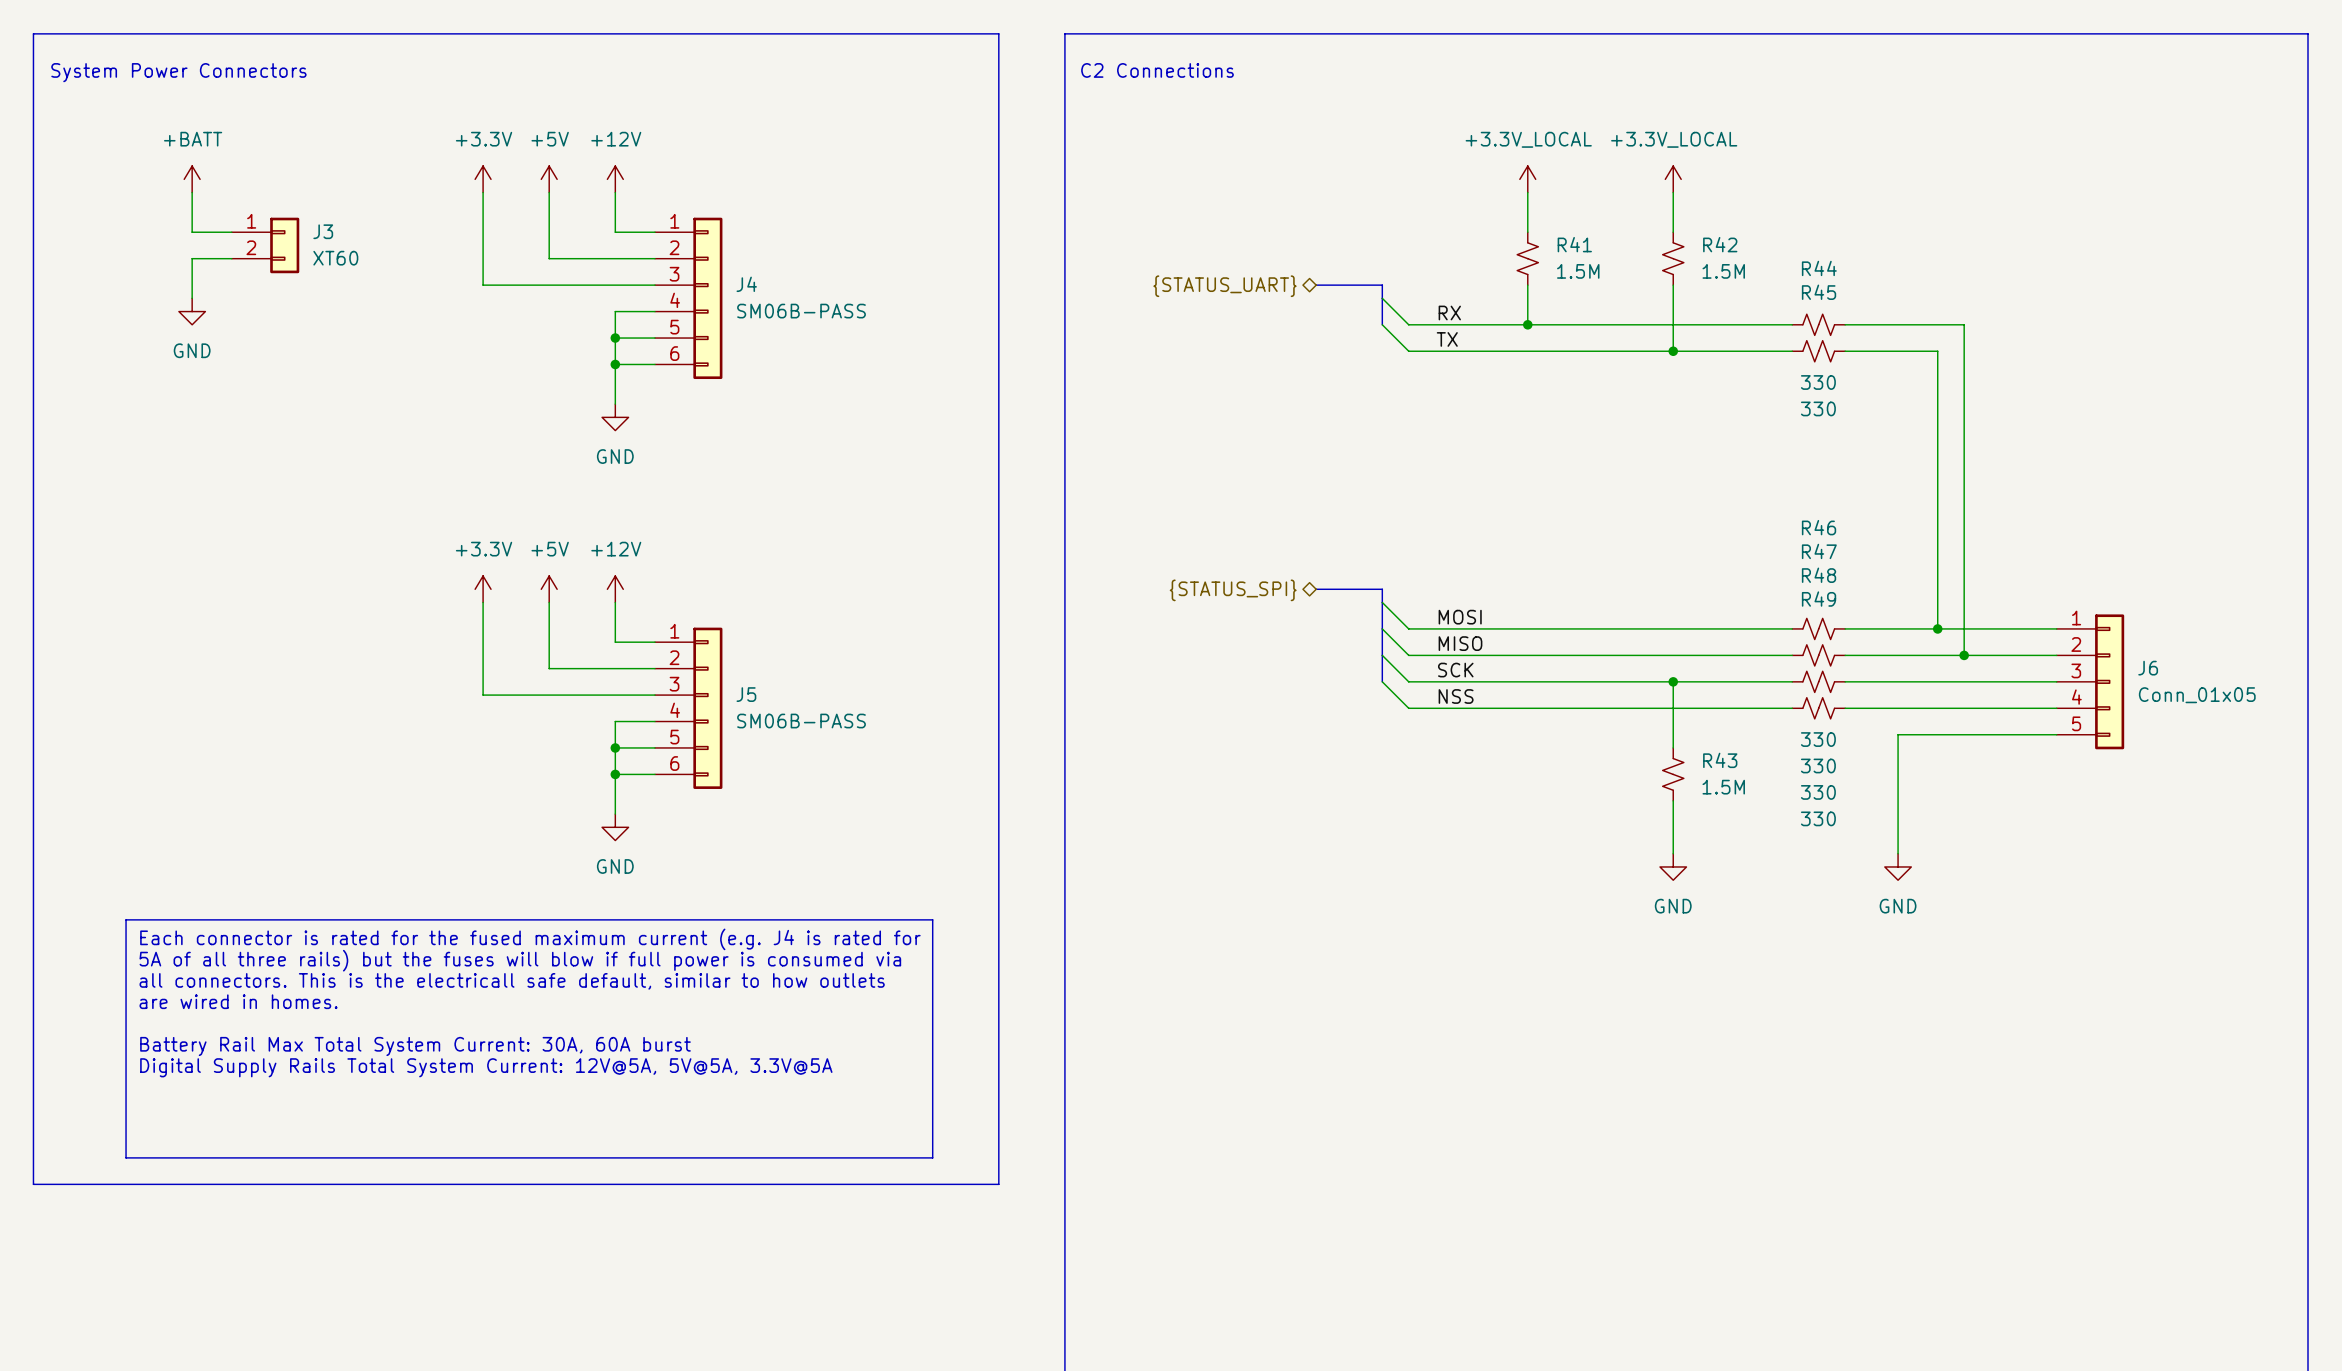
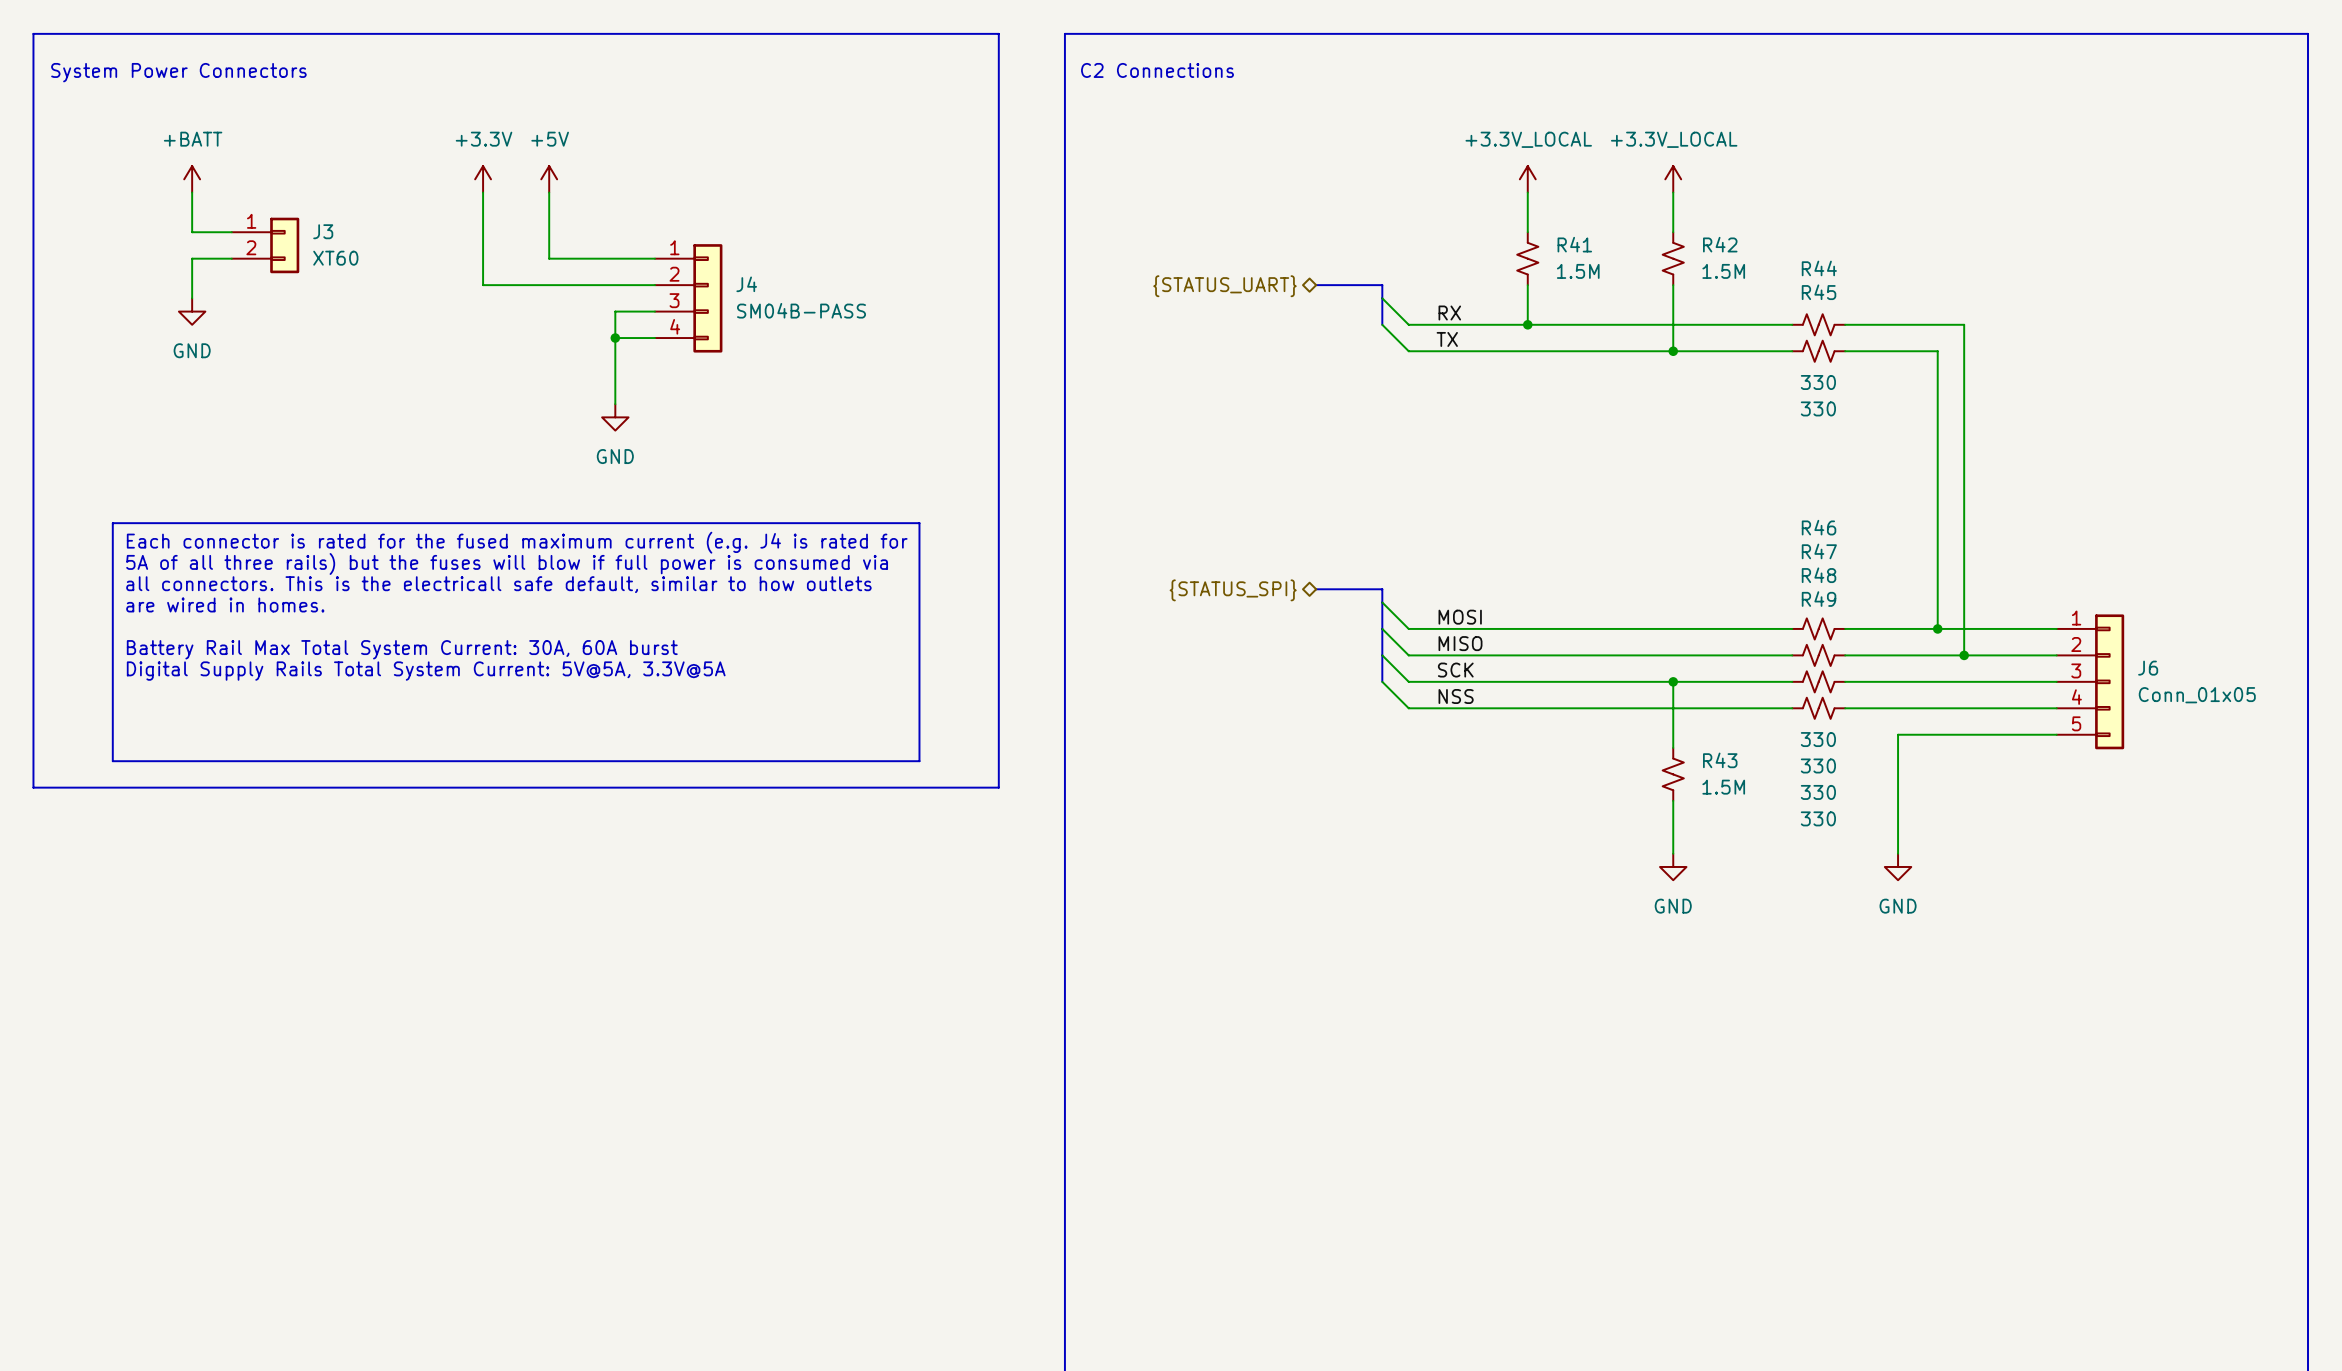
power symbol: +12V (615, 179) -> none
wire: (615, 192) (615, 232) (654, 232) -> none
J4 symbol: [654, 217, 723, 380] -> [654, 244, 723, 353]
J4 value: SM06B-PASS (801, 311) -> SM04B-PASS (801, 310)
wire: (615, 364) (654, 364) -> none
junction: (615, 364) -> none
line: none -> (112, 523) (919, 523) (919, 761) (112, 761) (112, 523)
text: none -> Each connector is rated for the fused maximum current (e.g. J4 is rated for (517, 542)
text: none -> 5A of all three rails) but the fuses will blow if full power is consumed via (507, 563)
text: none -> all connectors. This is the electricall safe default, similar to how outlets (498, 584)
power symbol: +3.3V (483, 589) -> none
power symbol: +5V (549, 589) -> none
power symbol: +12V (615, 589) -> none
wire: (483, 602) (483, 695) (654, 695) -> none
wire: (549, 602) (549, 668) (654, 668) -> none
wire: (615, 602) (615, 642) (654, 642) -> none
text: none -> are wired in homes. (225, 604)
text: none -> Battery Rail Max Total System Current: 30A, 60A burst (402, 649)
text: none -> Digital Supply Rails Total System Current: 5V@5A, 3.3V@5A (426, 671)
J5: SM06B-PASS (688, 708) -> none
wire: (654, 721) (615, 721) (615, 814) -> none
wire: (615, 747) (654, 747) -> none
junction: (615, 747) -> none
wire: (615, 774) (654, 774) -> none
junction: (615, 774) -> none
line: (33, 787) (33, 1184) (998, 1184) (998, 787) -> (33, 787) (998, 787)
power symbol: GND (615, 827) -> none
line: (126, 919) (932, 919) (932, 1157) (126, 1157) (126, 919) -> none
text: Each connector is rated for the fused maximum current (e.g. J4 is rated for (530, 939) -> none
text: 5A of all three rails) but the fuses will blow if full power is consumed via (520, 960) -> none
text: all connectors. This is the electricall safe default, similar to how outlets (512, 981) -> none
text: are wired in homes. (238, 1001) -> none
text: Battery Rail Max Total System Current: 30A, 60A burst (415, 1046) -> none
text: Digital Supply Rails Total System Current: 12V@5A, 5V@5A, 3.3V@5A (486, 1067) -> none

